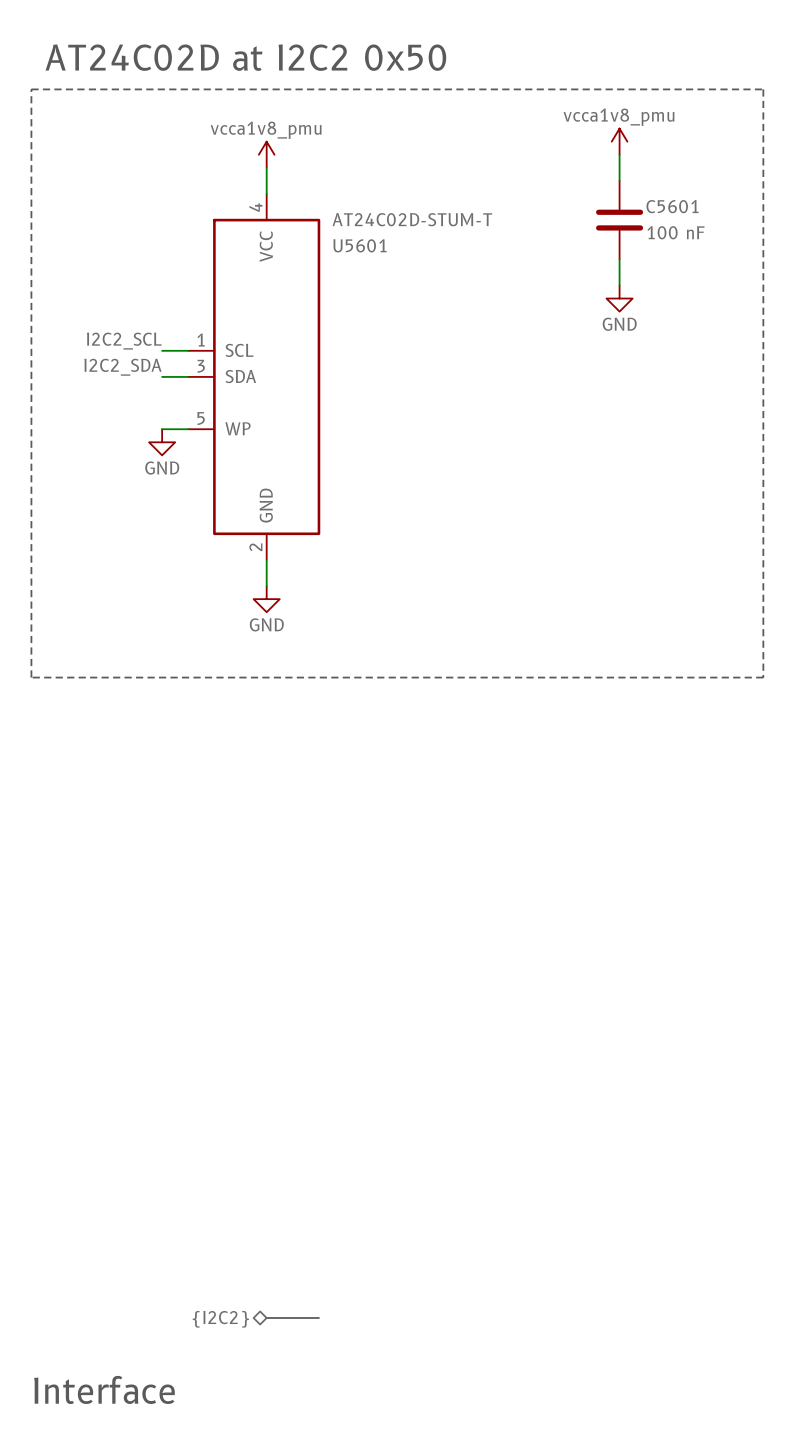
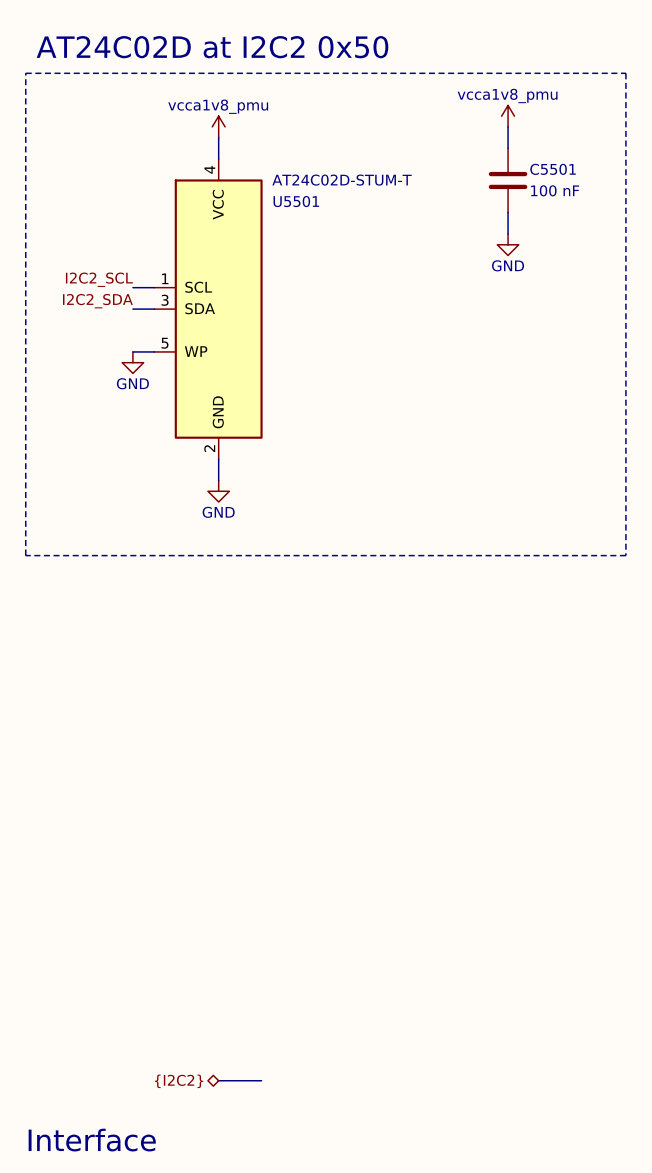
C5601 name: C5601 (672, 206) -> C5501 (553, 169)
U5601 name: U5601 (359, 245) -> U5501 (296, 201)

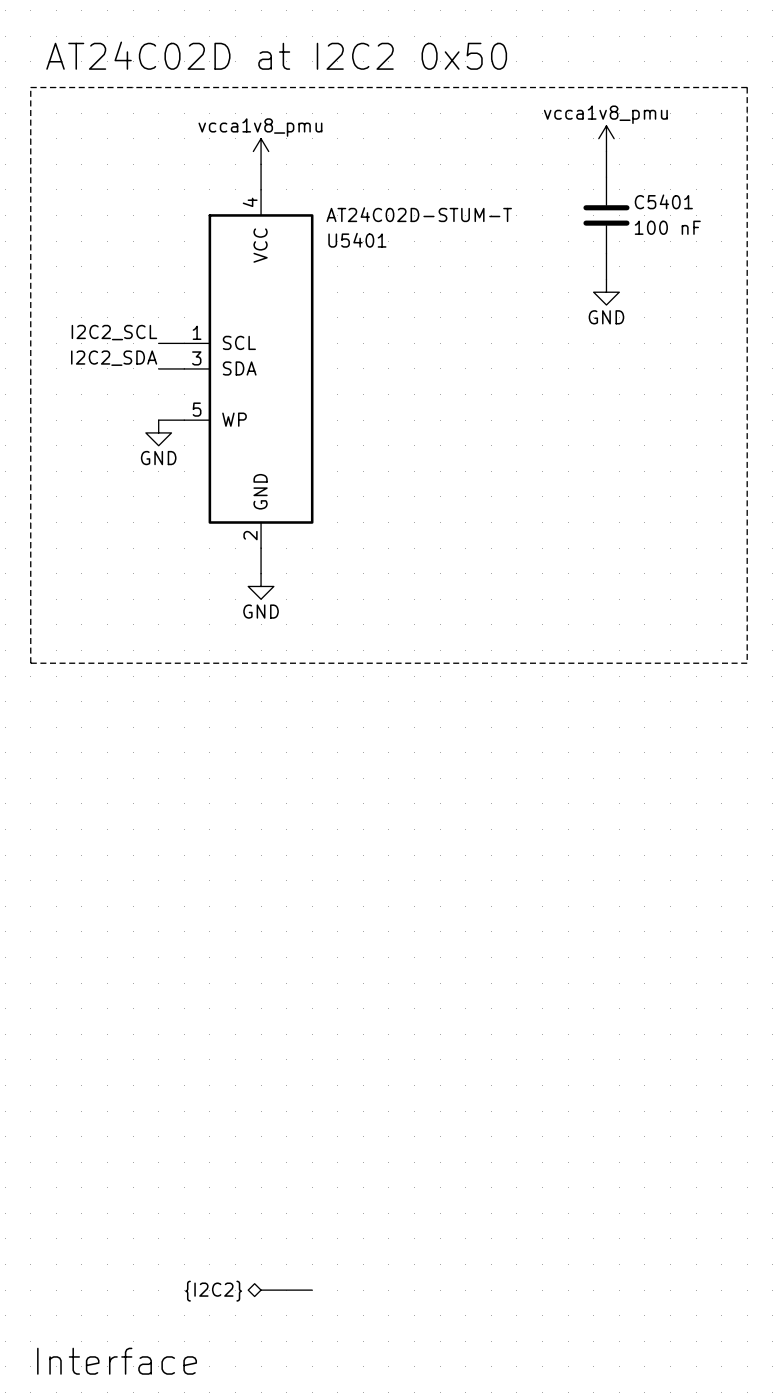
C5501 name: C5501 (553, 169) -> C5401 (663, 201)
U5501 name: U5501 (296, 201) -> U5401 (357, 240)

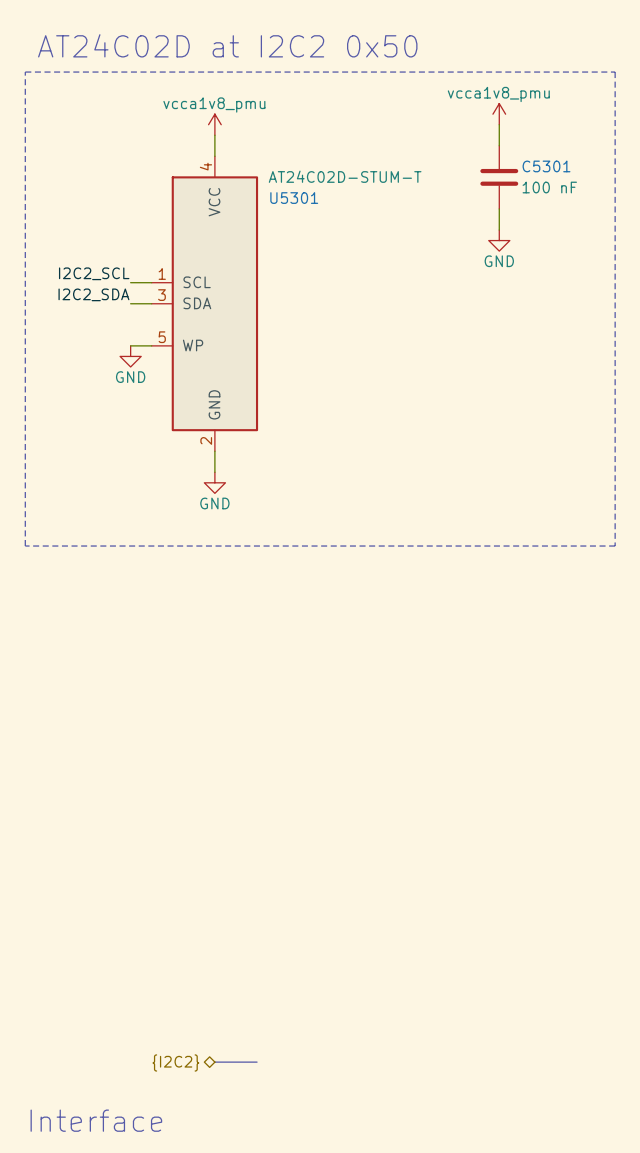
C5401 name: C5401 (663, 201) -> C5301 (546, 166)
U5401 name: U5401 (357, 240) -> U5301 (294, 198)

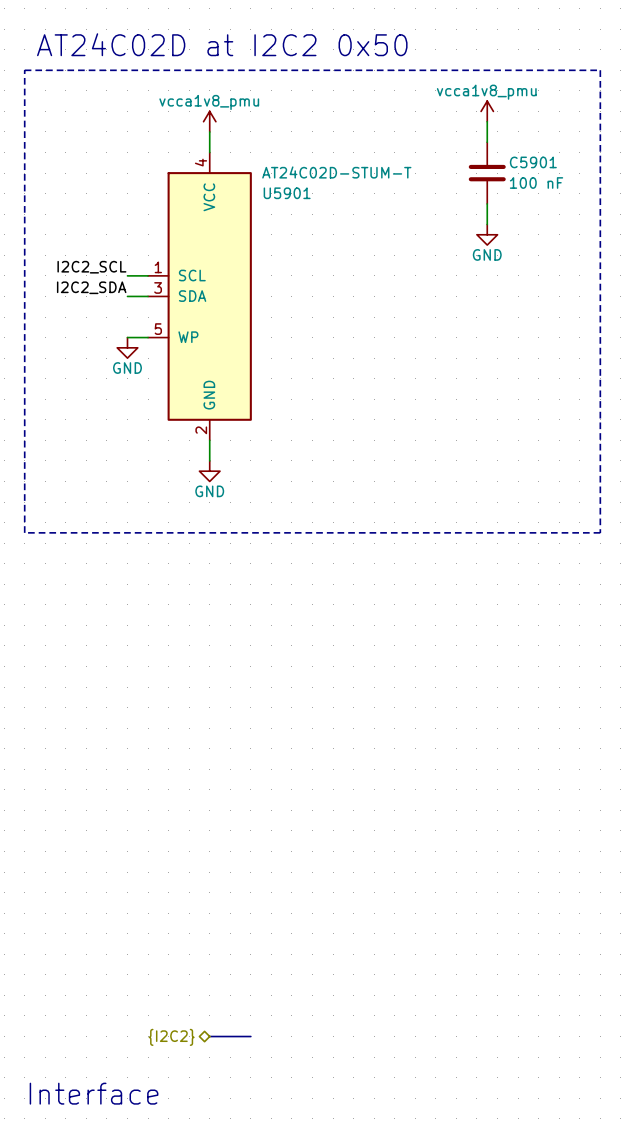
C5301 name: C5301 (546, 166) -> C5901 (533, 162)
U5301 name: U5301 (294, 198) -> U5901 (287, 193)

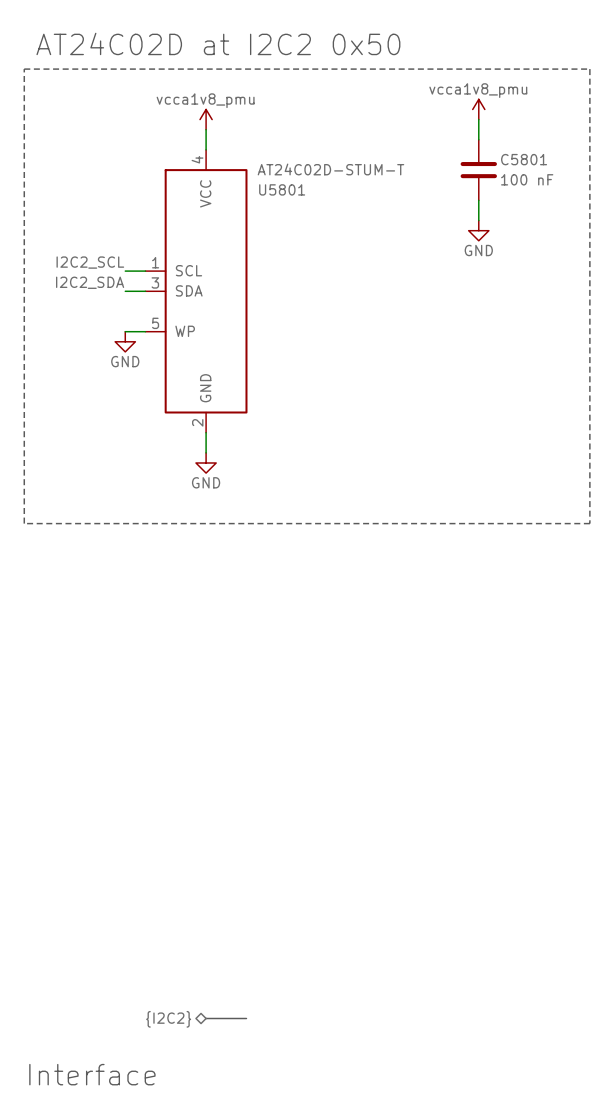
C5901 name: C5901 (533, 162) -> C5801 (524, 159)
U5901 name: U5901 (287, 193) -> U5801 (282, 189)

